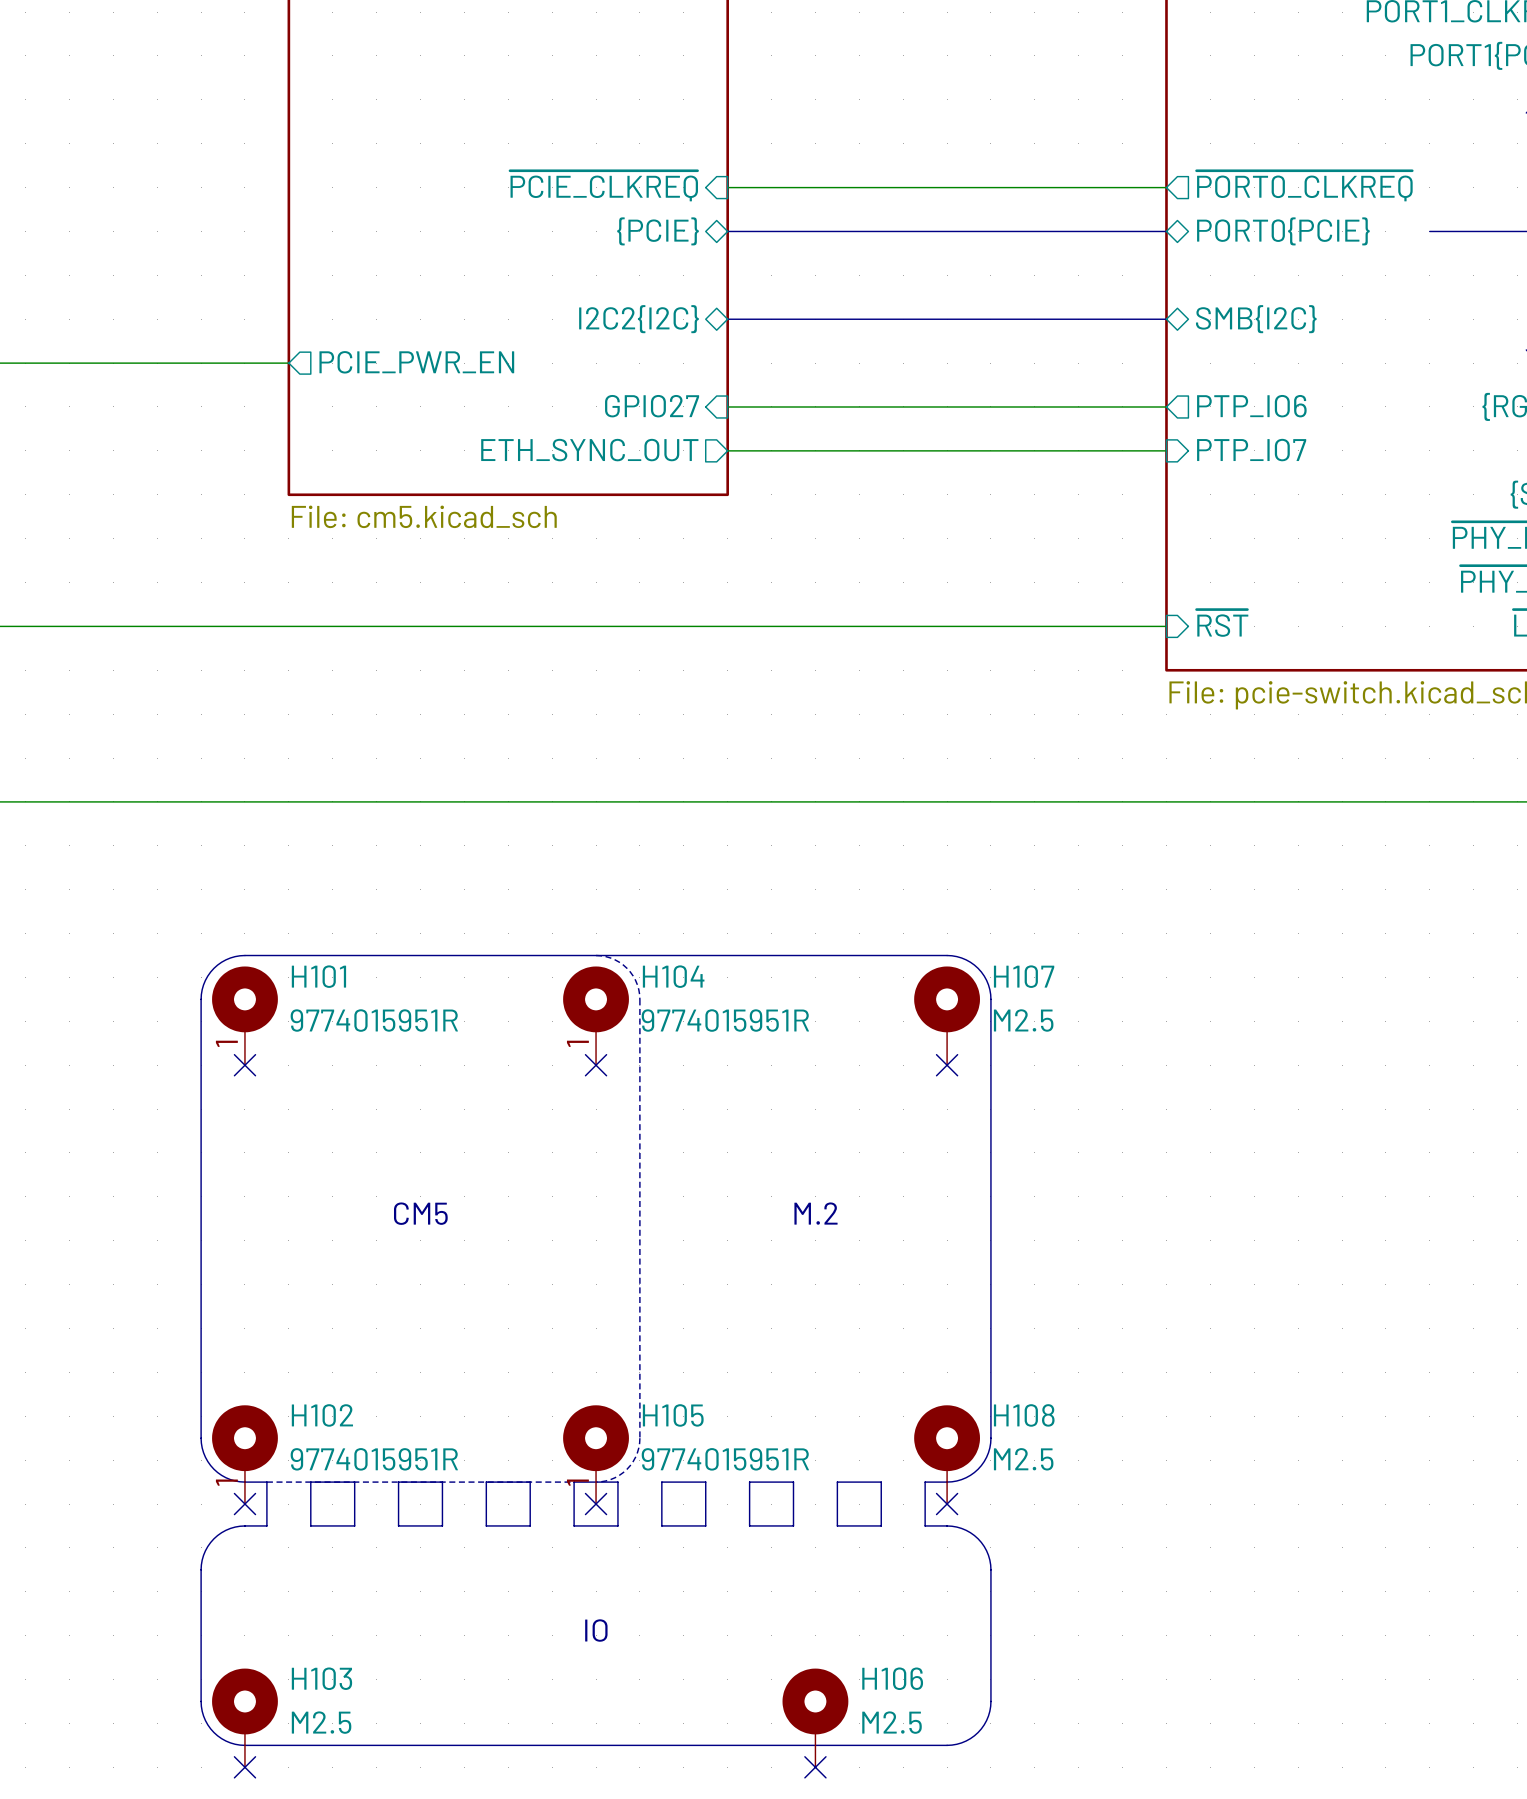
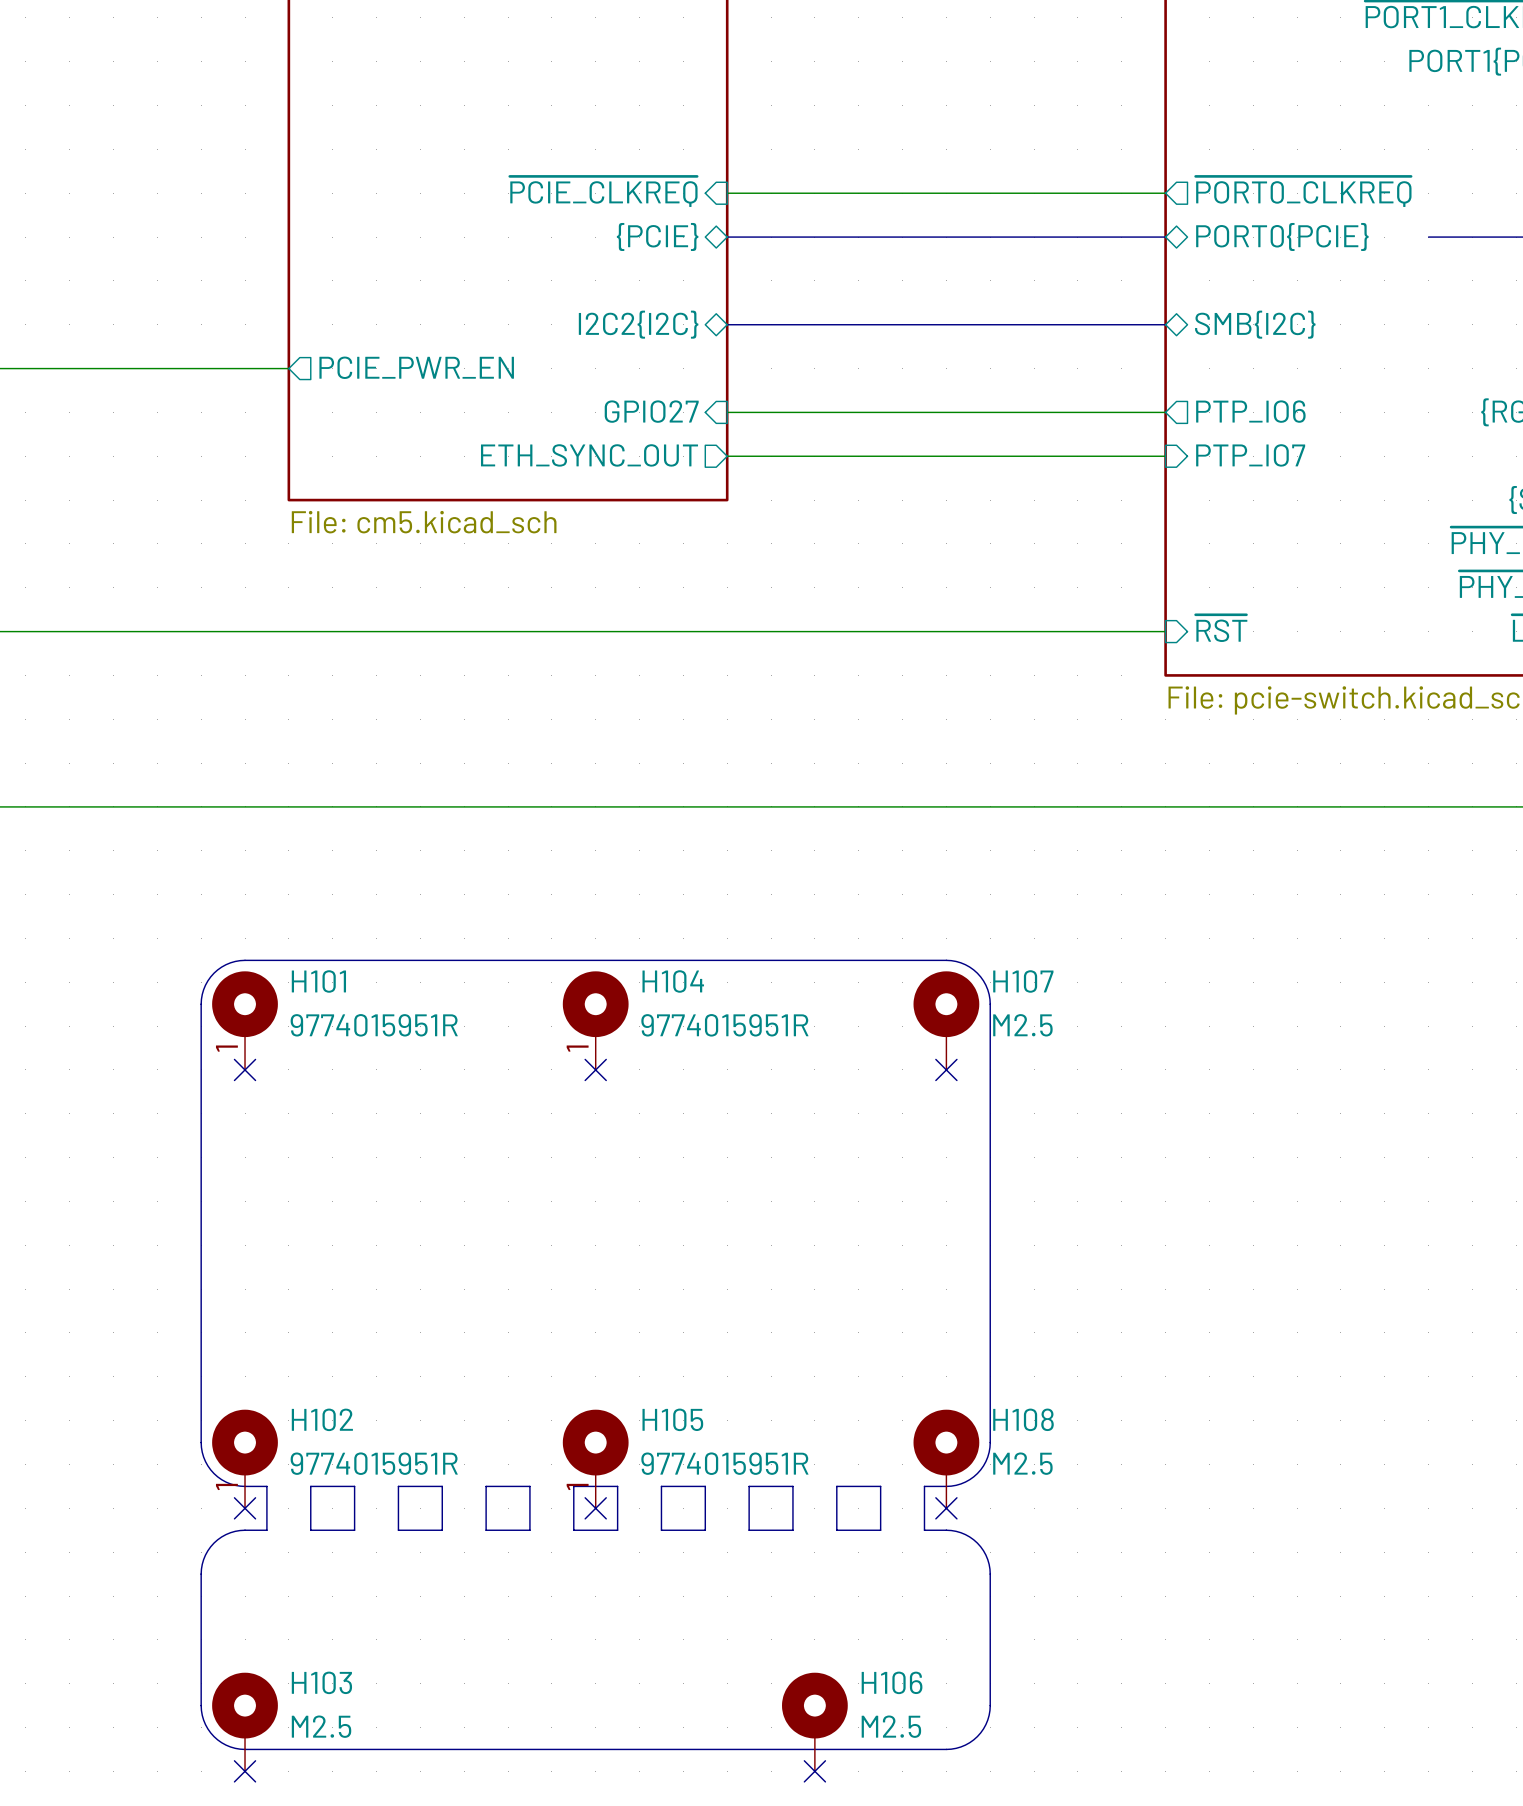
line: (596, 955) (615, 959) (627, 968) (637, 984) (639, 999) (639, 1443) (635, 1457) (623, 1472) (610, 1479) (596, 1482) -> none
text: CM5 (420, 1213) -> none
text: M.2 (815, 1213) -> none
line: (266, 1482) (574, 1482) -> none
text: IO (596, 1630) -> none

